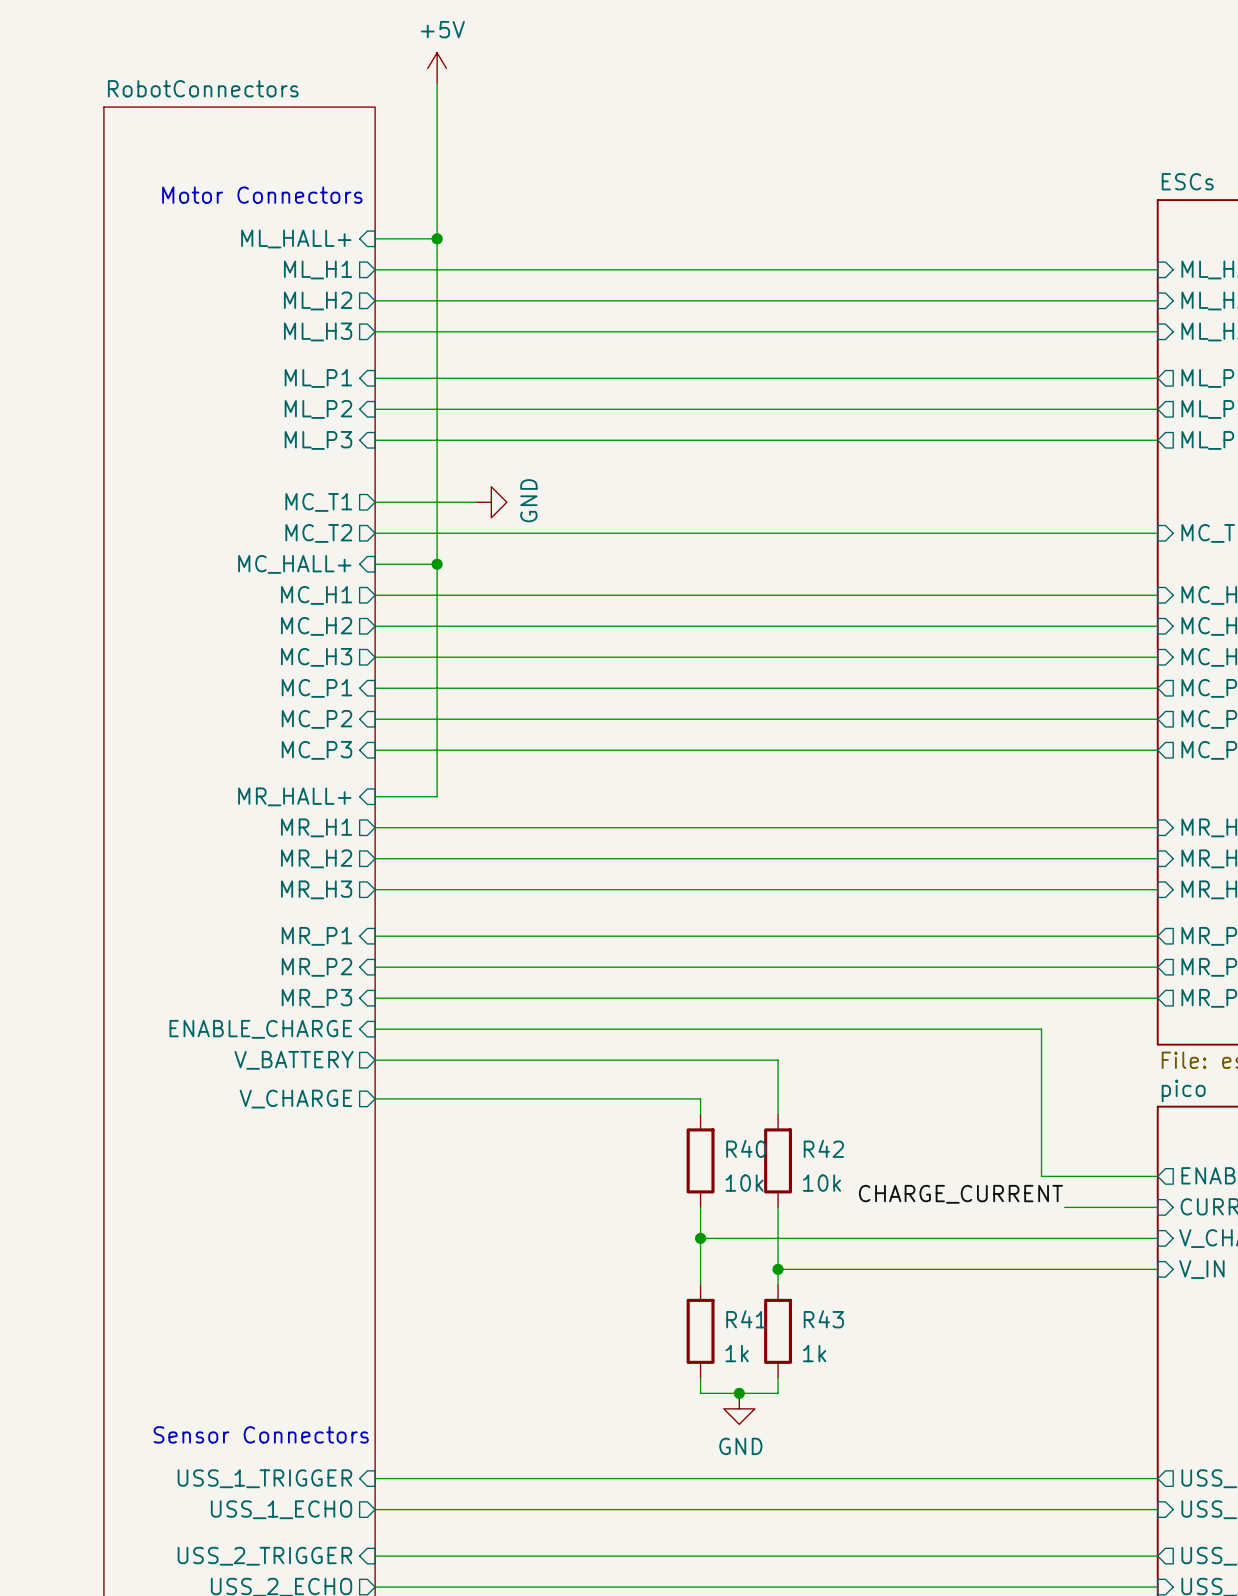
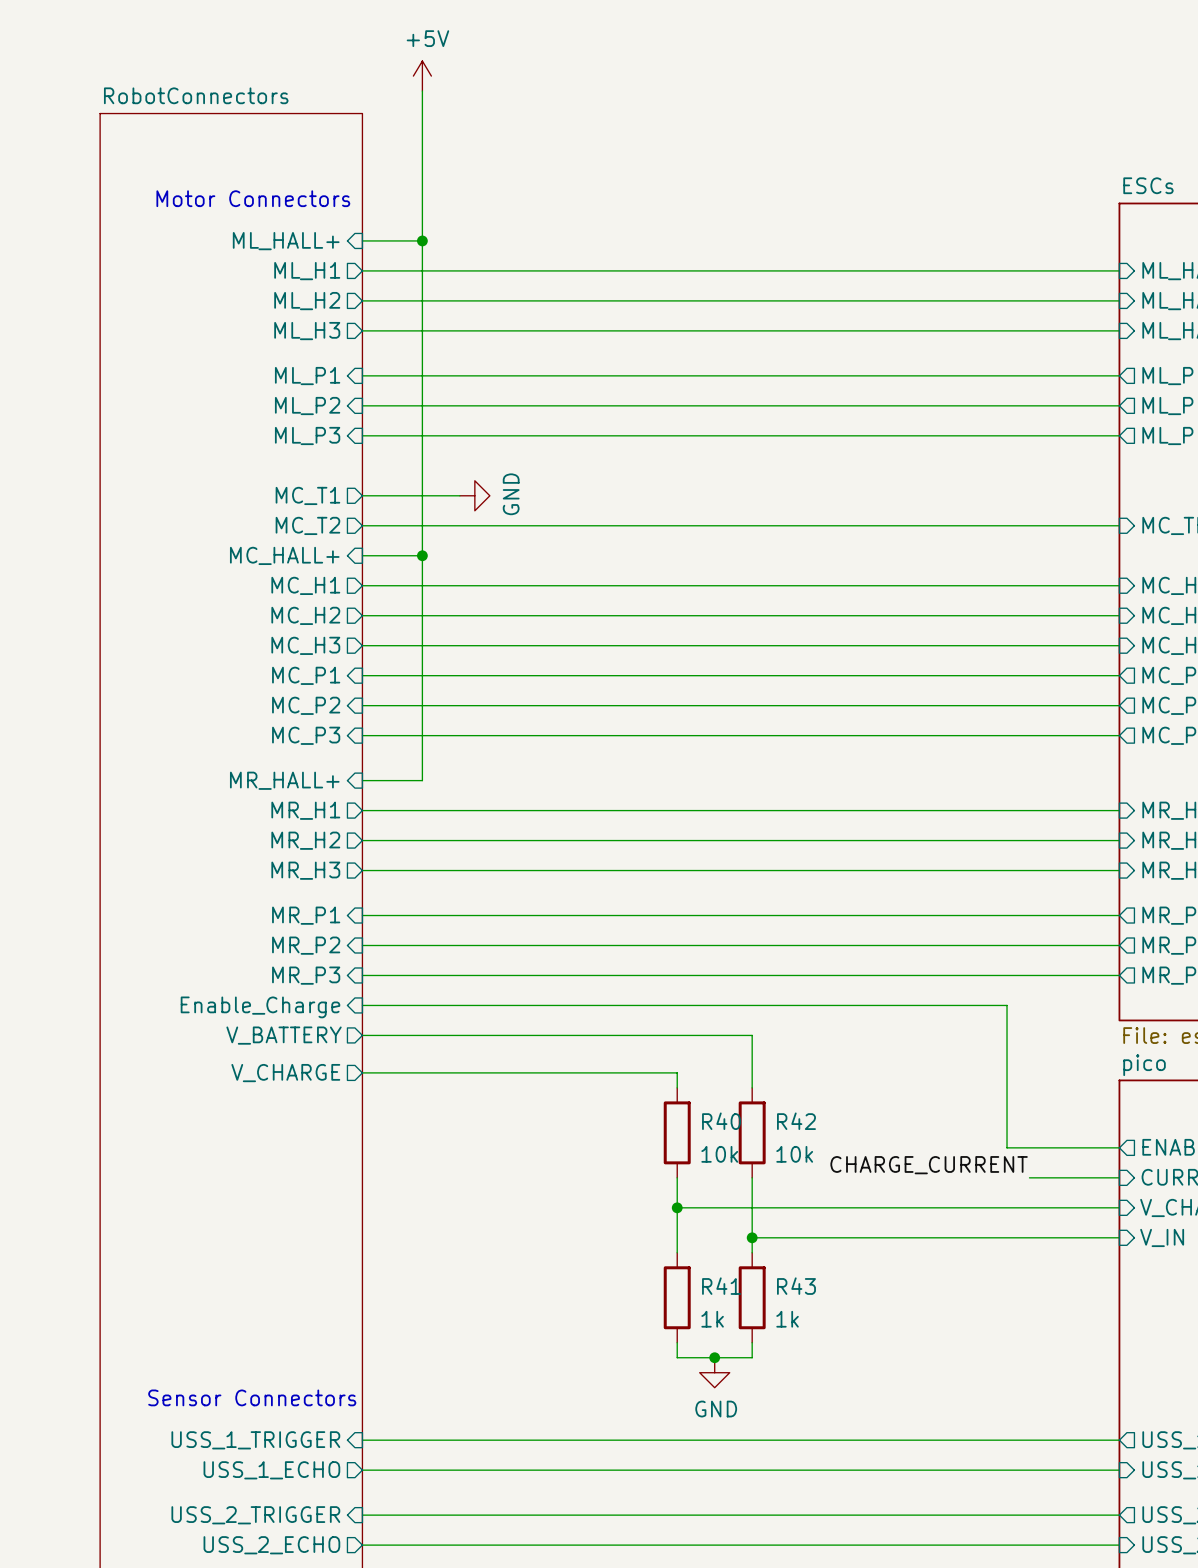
sheet pin: ENABLE_CHARGE (260, 1029) -> Enable_Charge (260, 1007)

